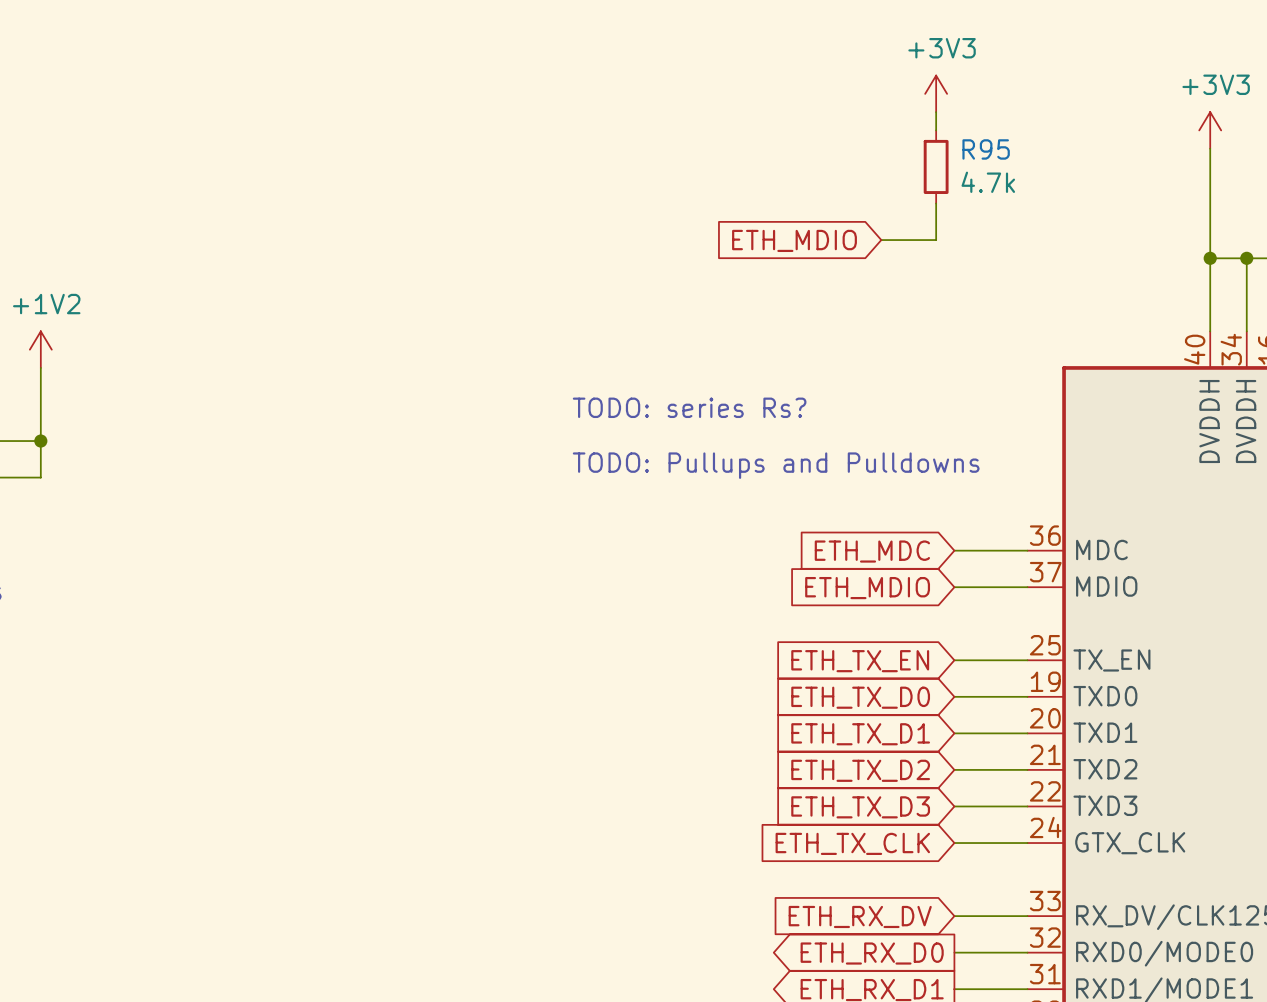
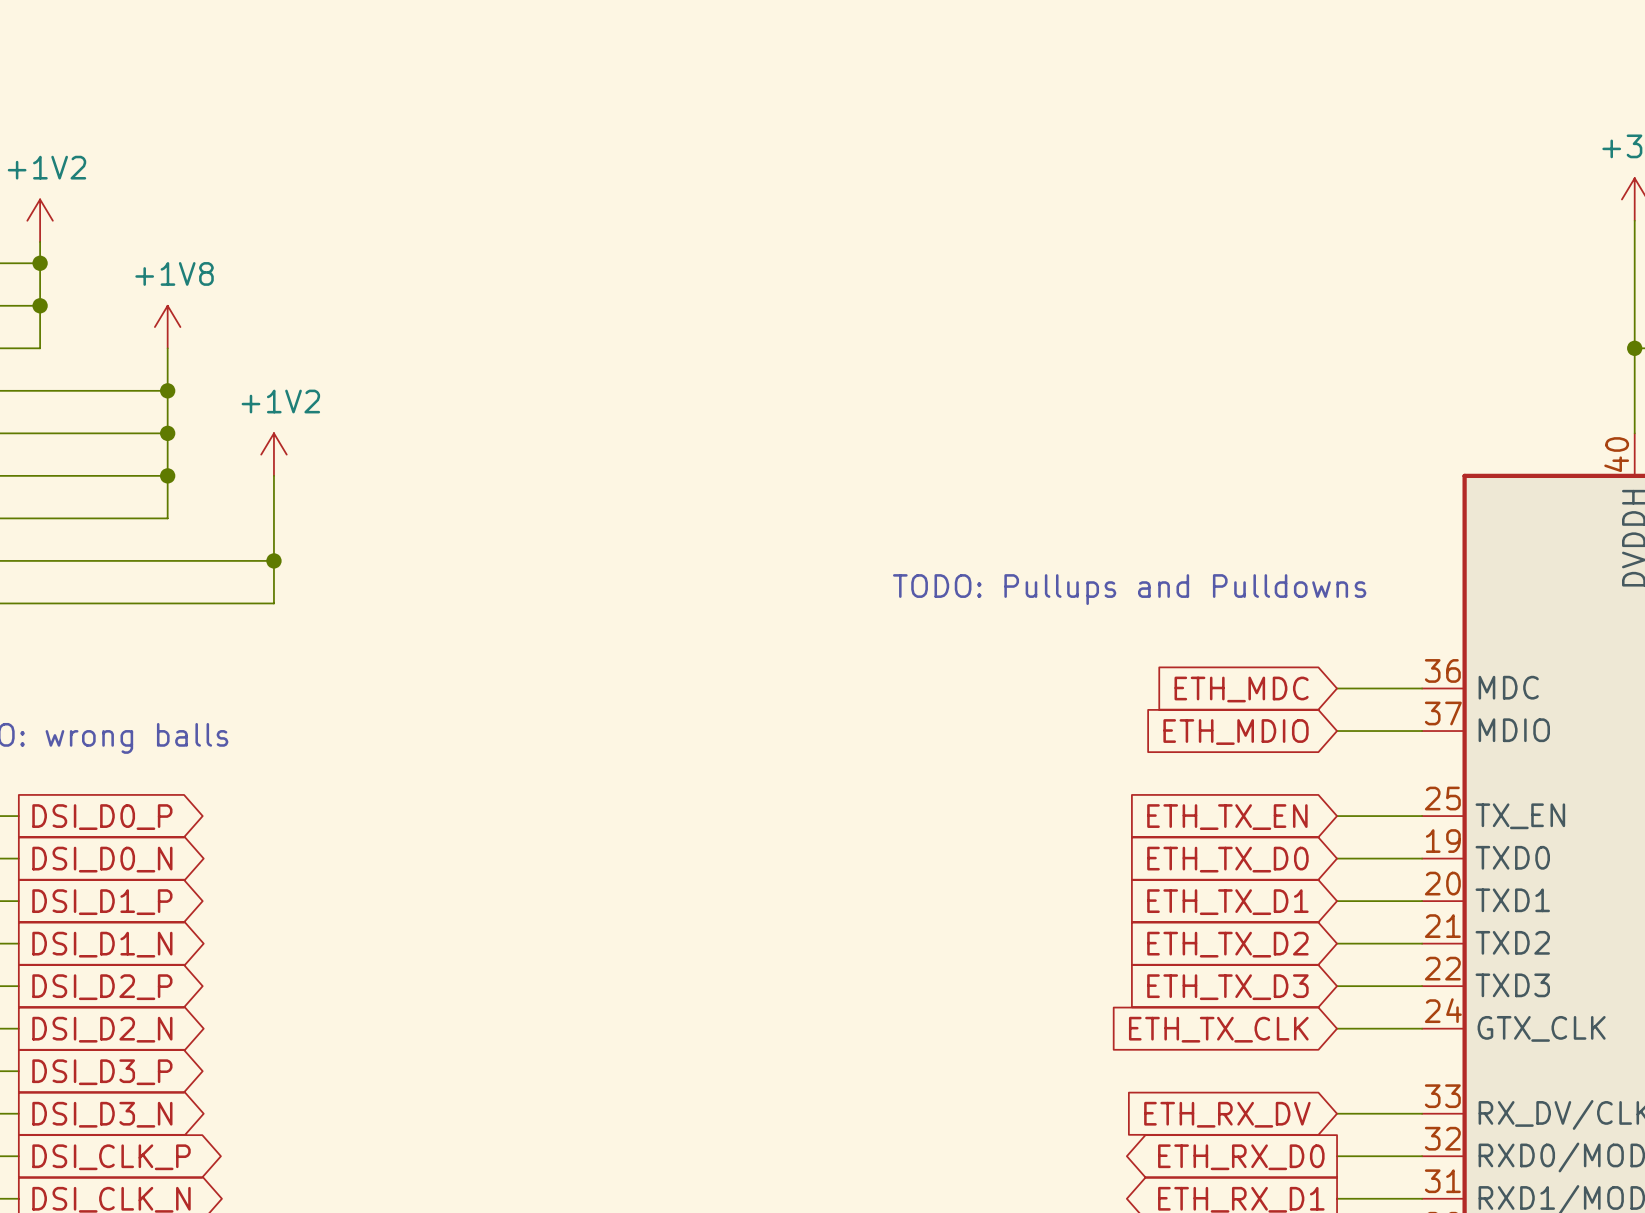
power symbol: +3V3 (936, 93) -> none
wire: (936, 112) (936, 130) -> none
R95: 4.7k (936, 166) -> none
wire: (936, 203) (936, 240) (881, 240) -> none
global label: ETH_MDIO (794, 240) -> none
text: TODO: series Rs? (689, 407) -> none

